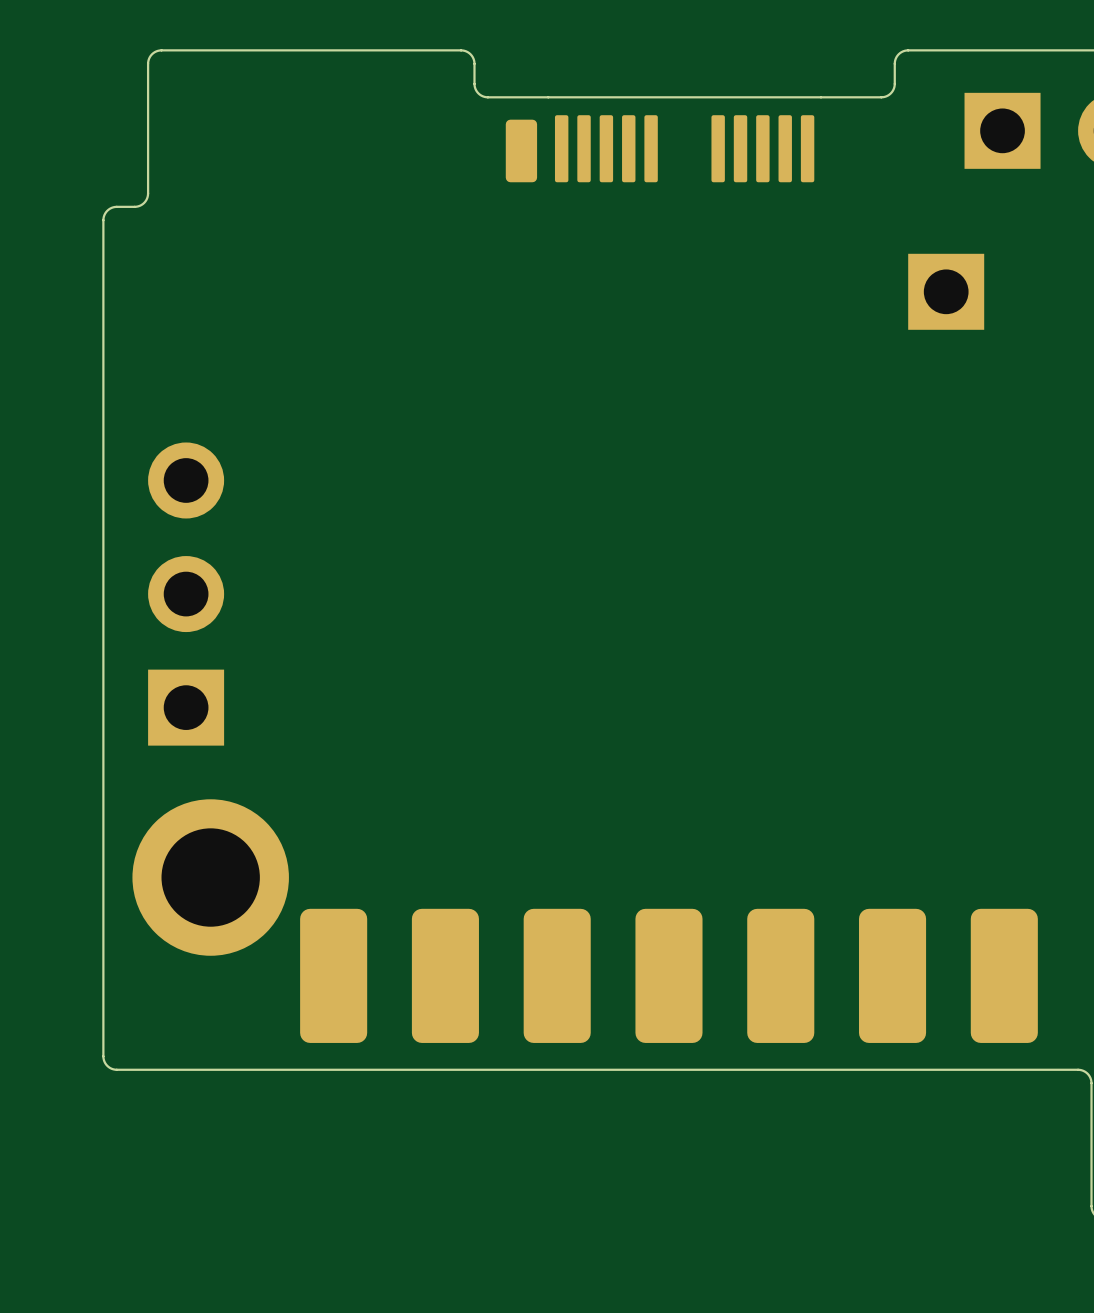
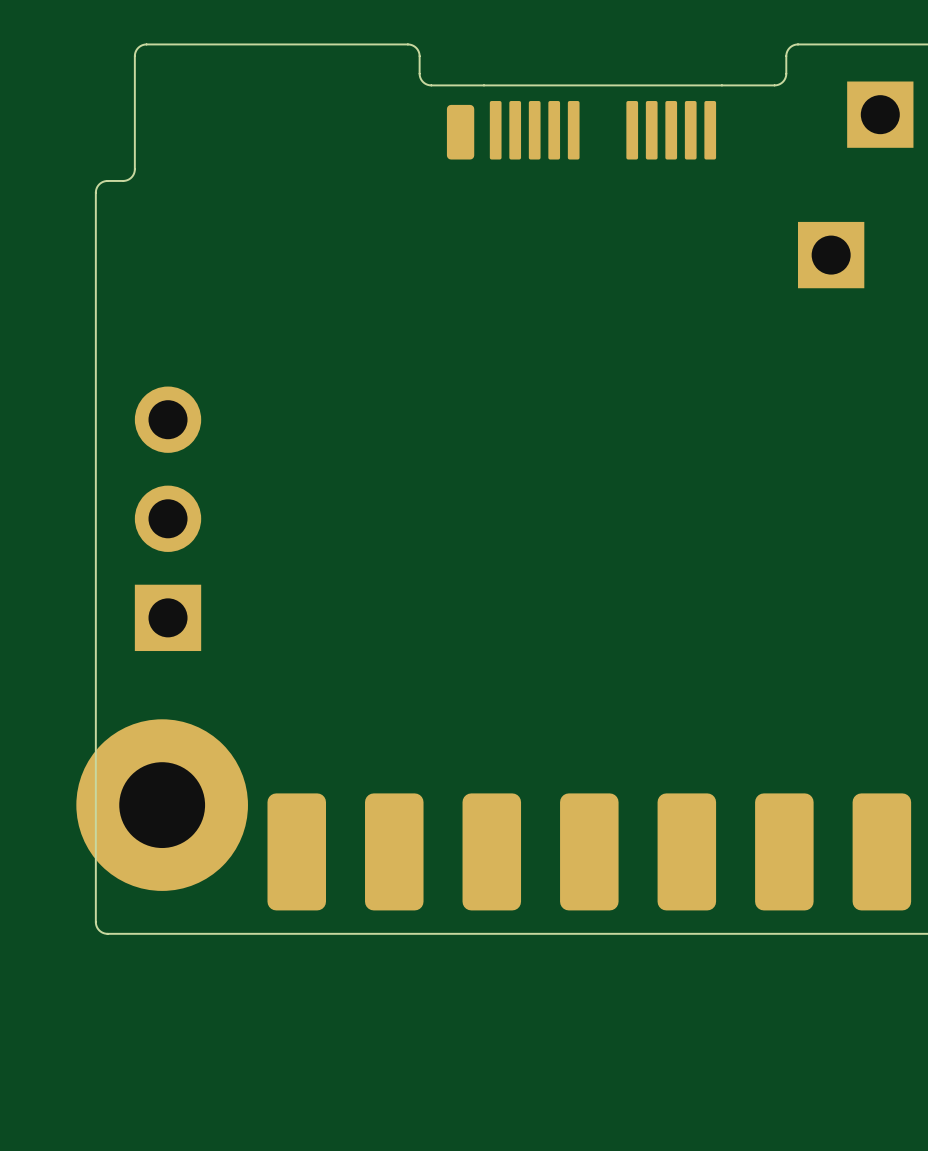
part: (210, 877) -> none
part: none -> (162, 805)

